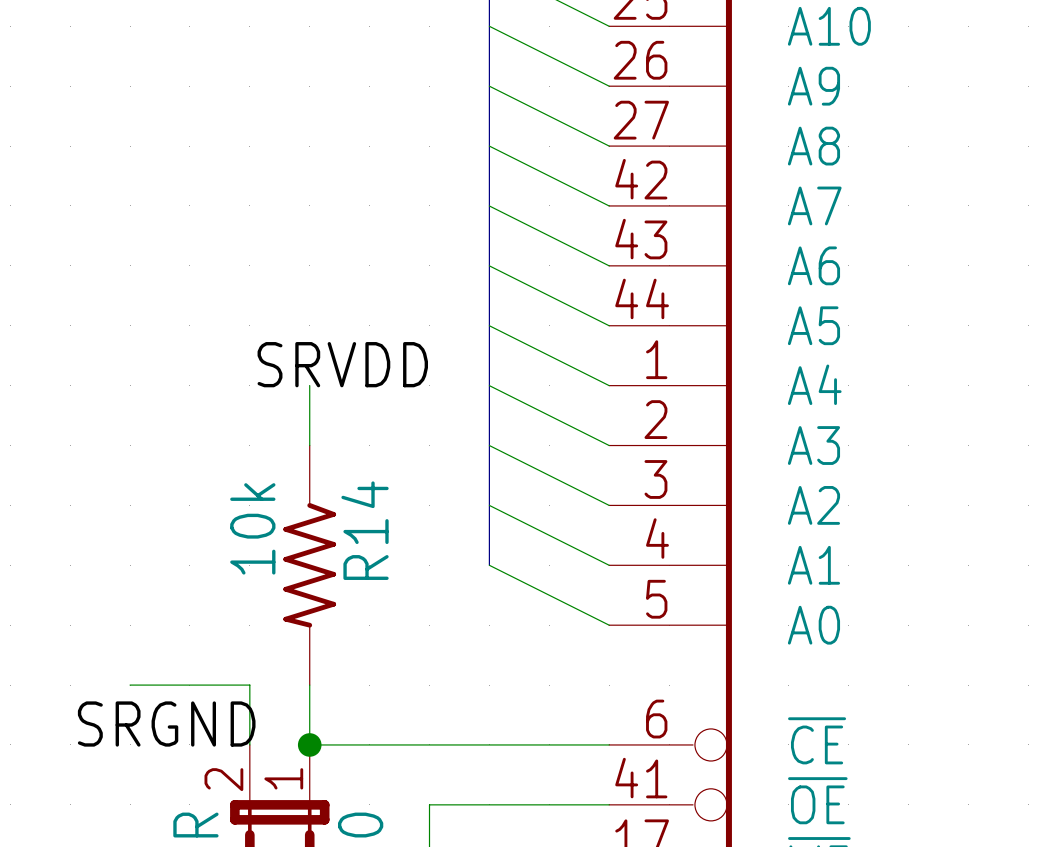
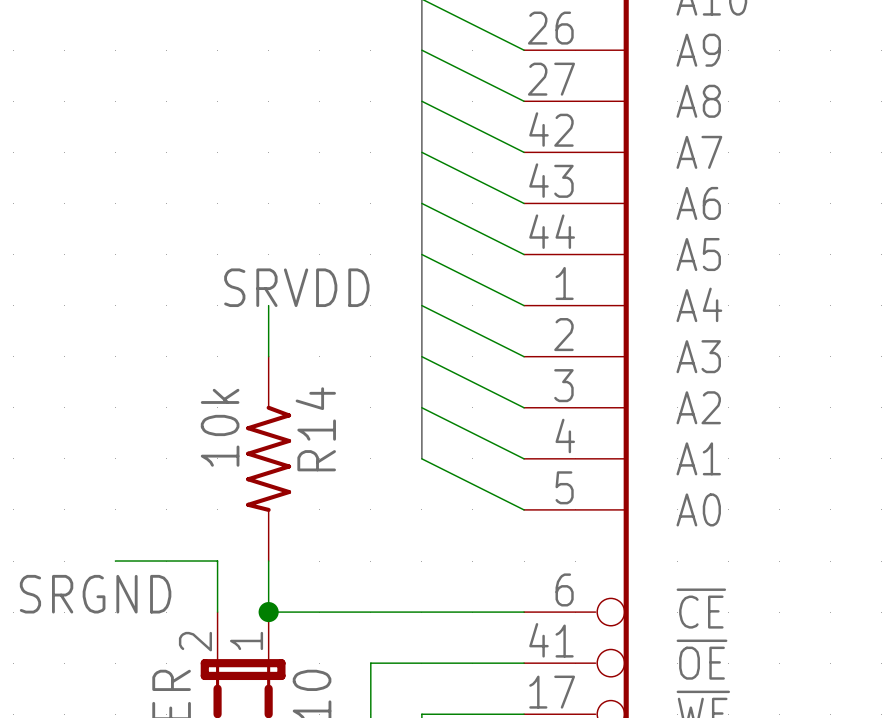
label position: SRGND (166, 724) -> SRGND (95, 594)

